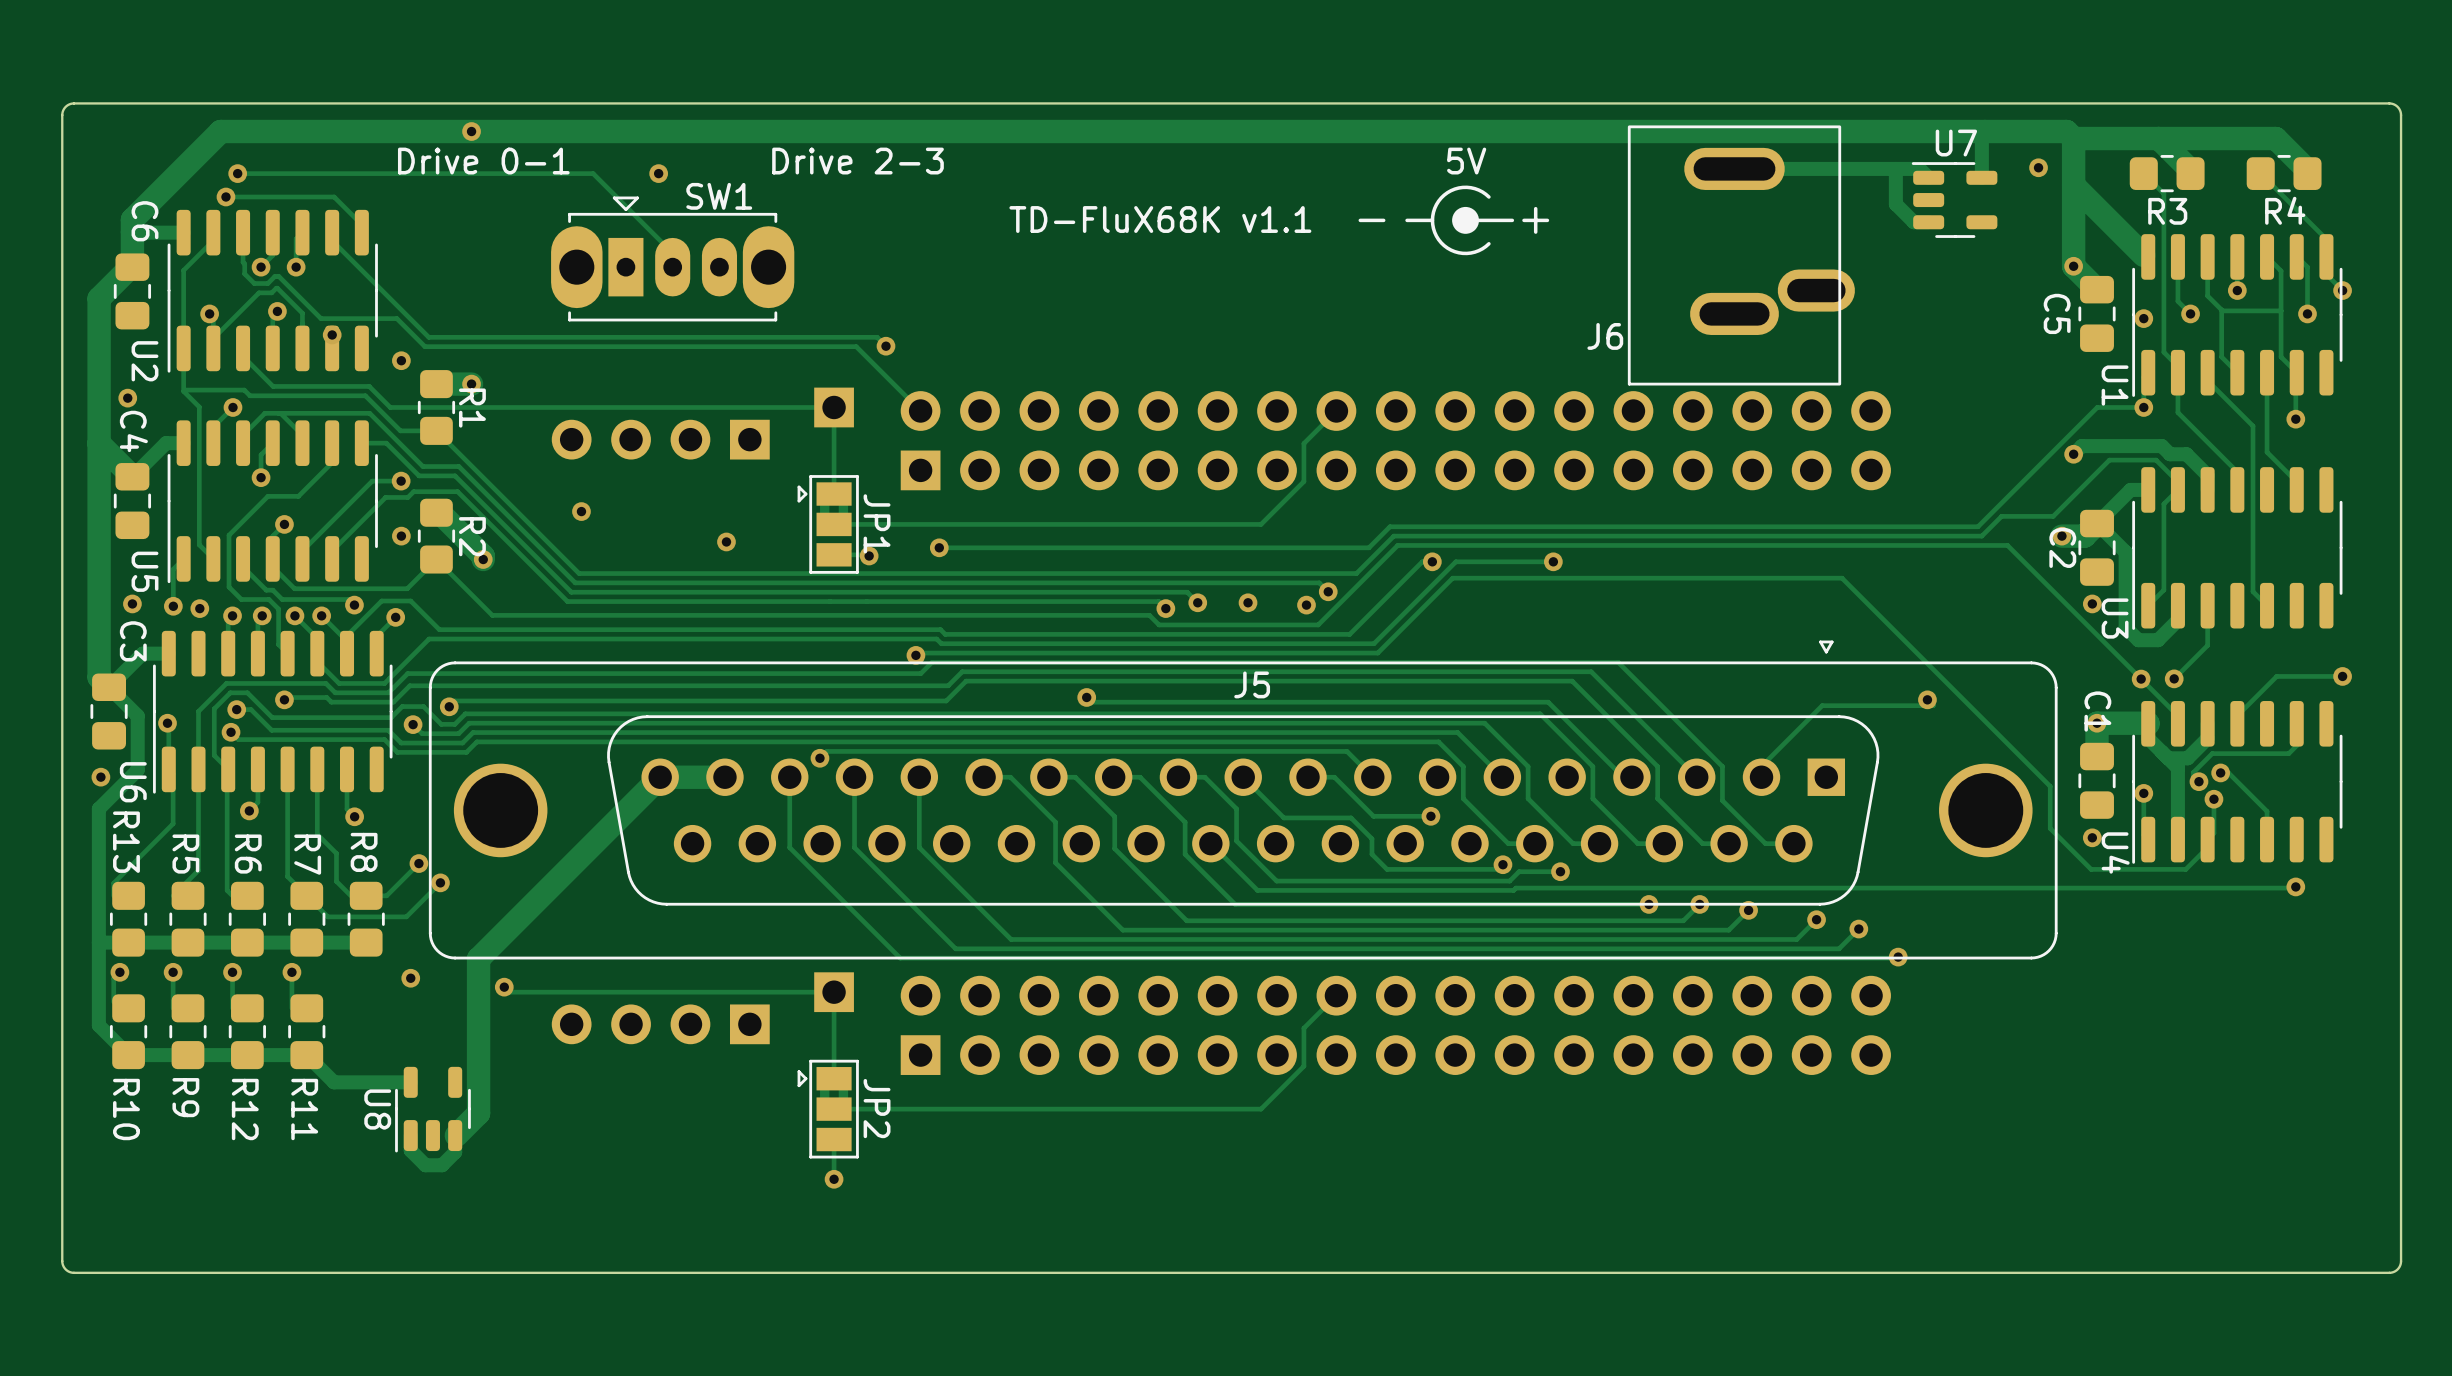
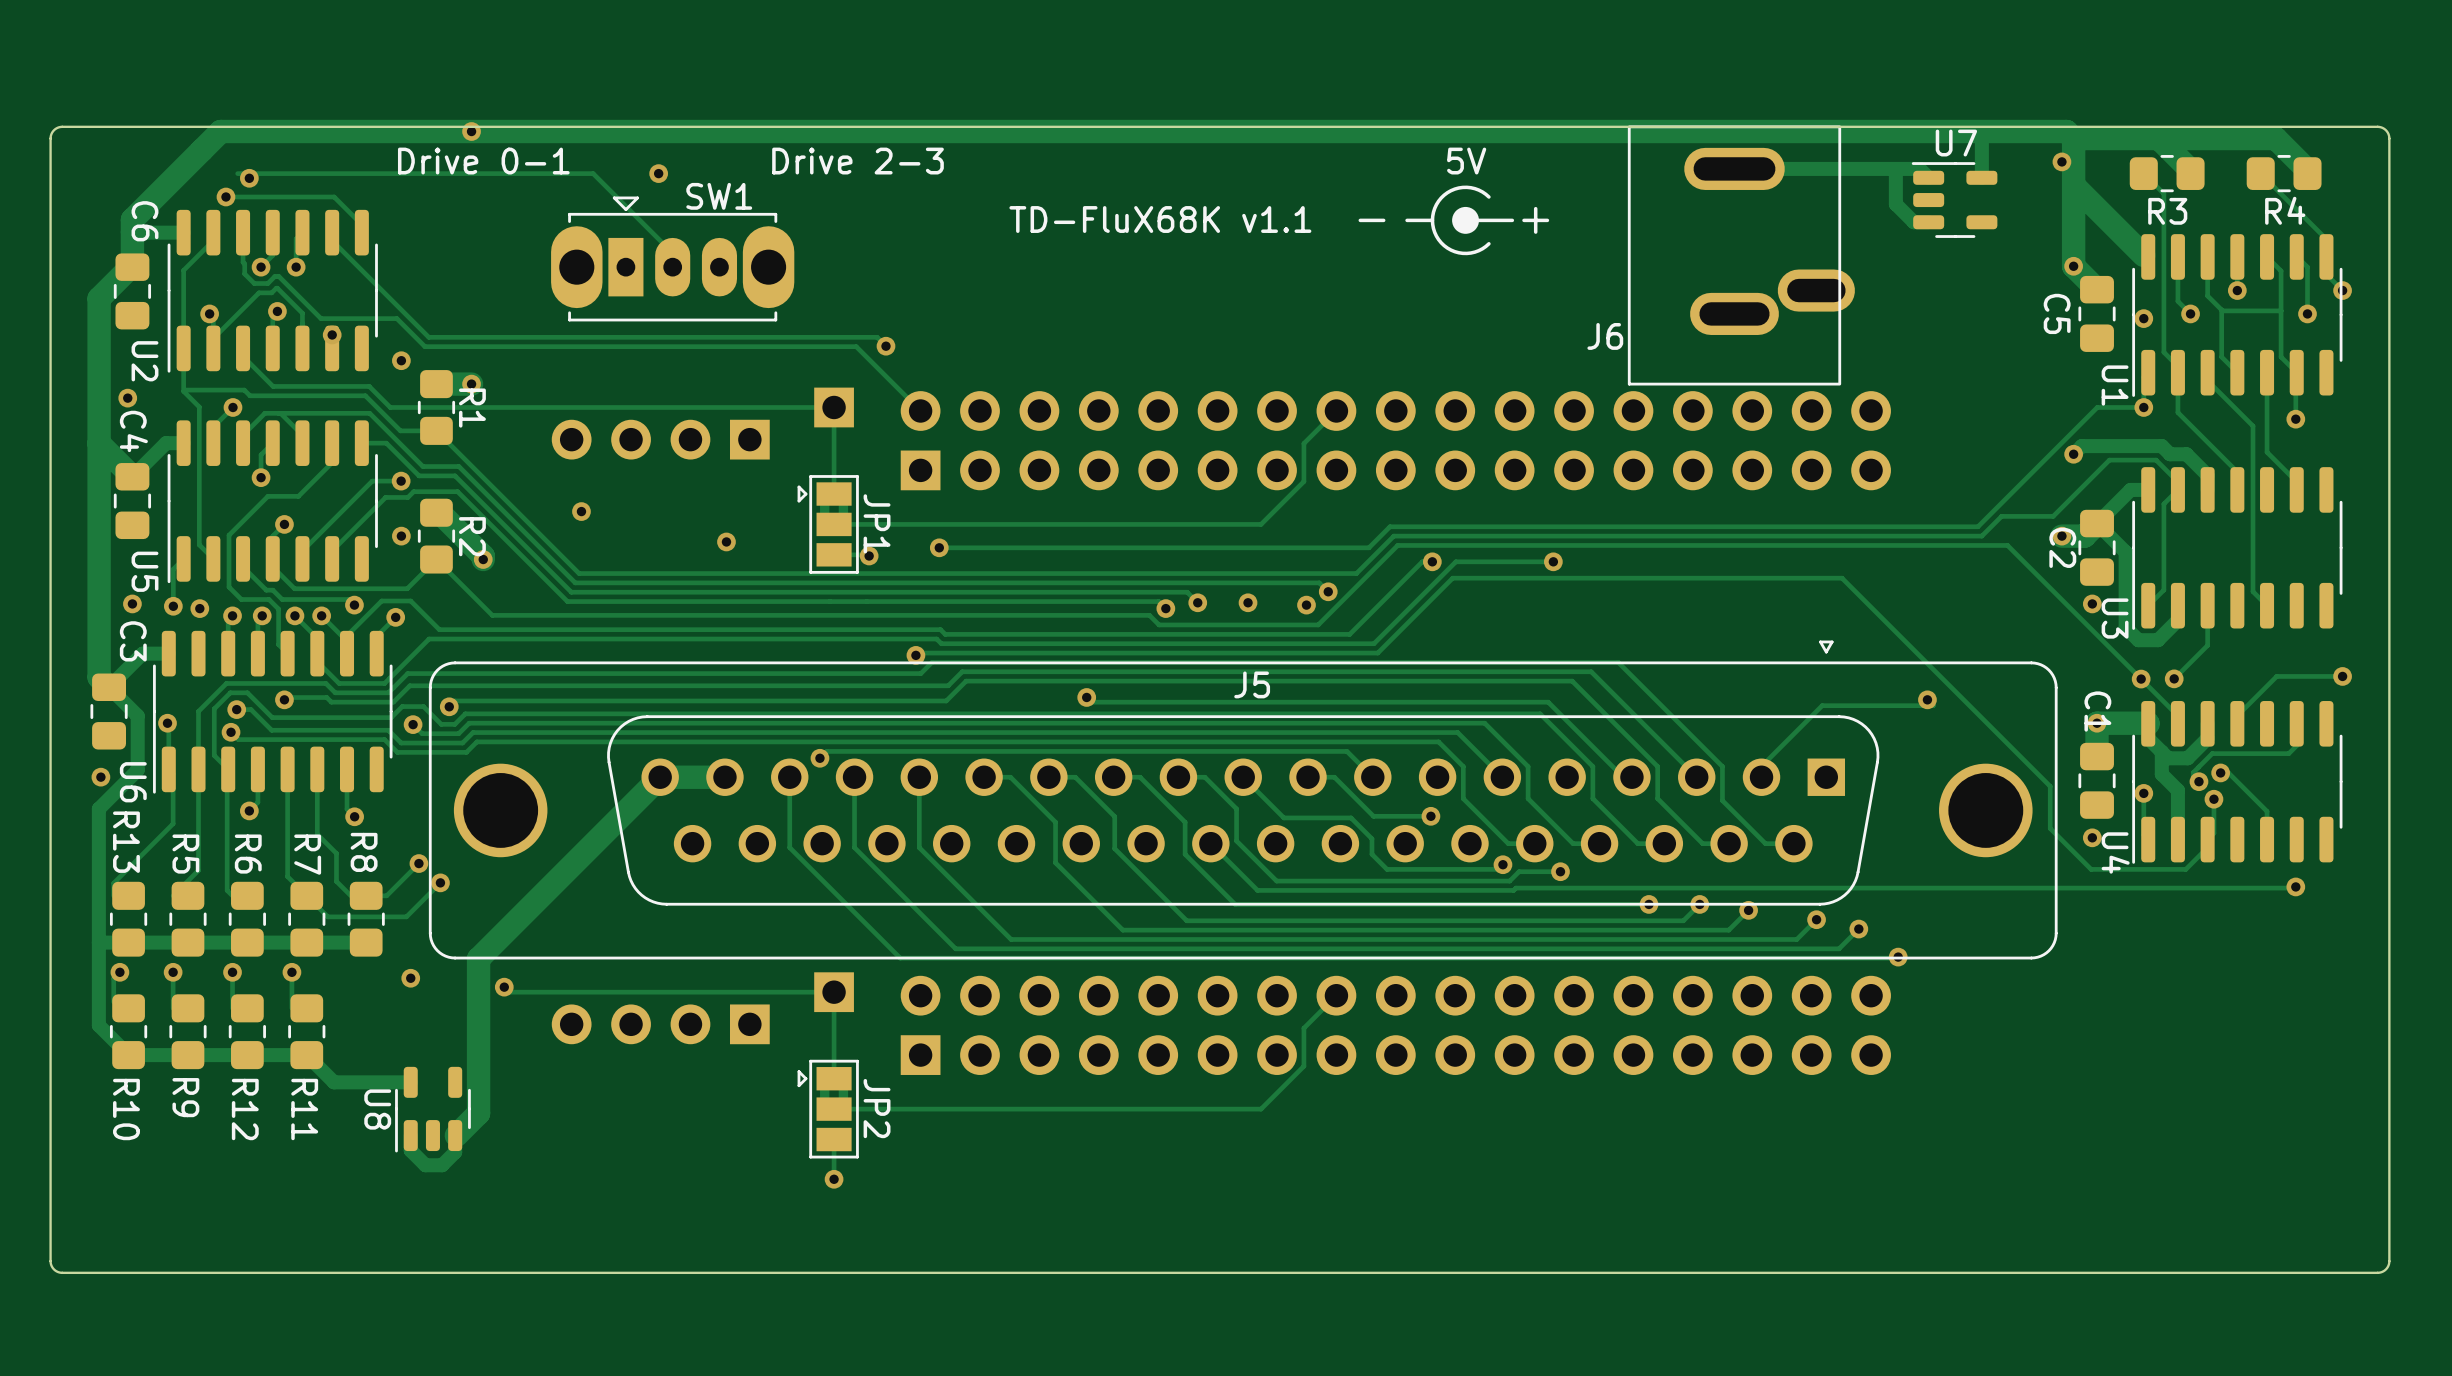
via position: (2038, 167) -> (2061, 161)
via position: (237, 173) -> (249, 178)
track: (2168, 758) (2177, 768) (2177, 790) -> (2161, 751) (2161, 774) (2177, 790)
board edge: (2377, 1272) (2395, 1271) (2399, 1266) (2401, 1261) (2401, 115) (2397, 106) (2389, 103) (73, 103) (68, 105) (63, 109) (62, 115) (62, 1261) (65, 1269) (73, 1272) -> (2377, 1272) (2385, 1269) (2389, 1261) (2389, 138) (2387, 132) (2383, 128) (2377, 126) (62, 126) (54, 130) (50, 138) (50, 1261) (52, 1266) (56, 1271) (73, 1272)

